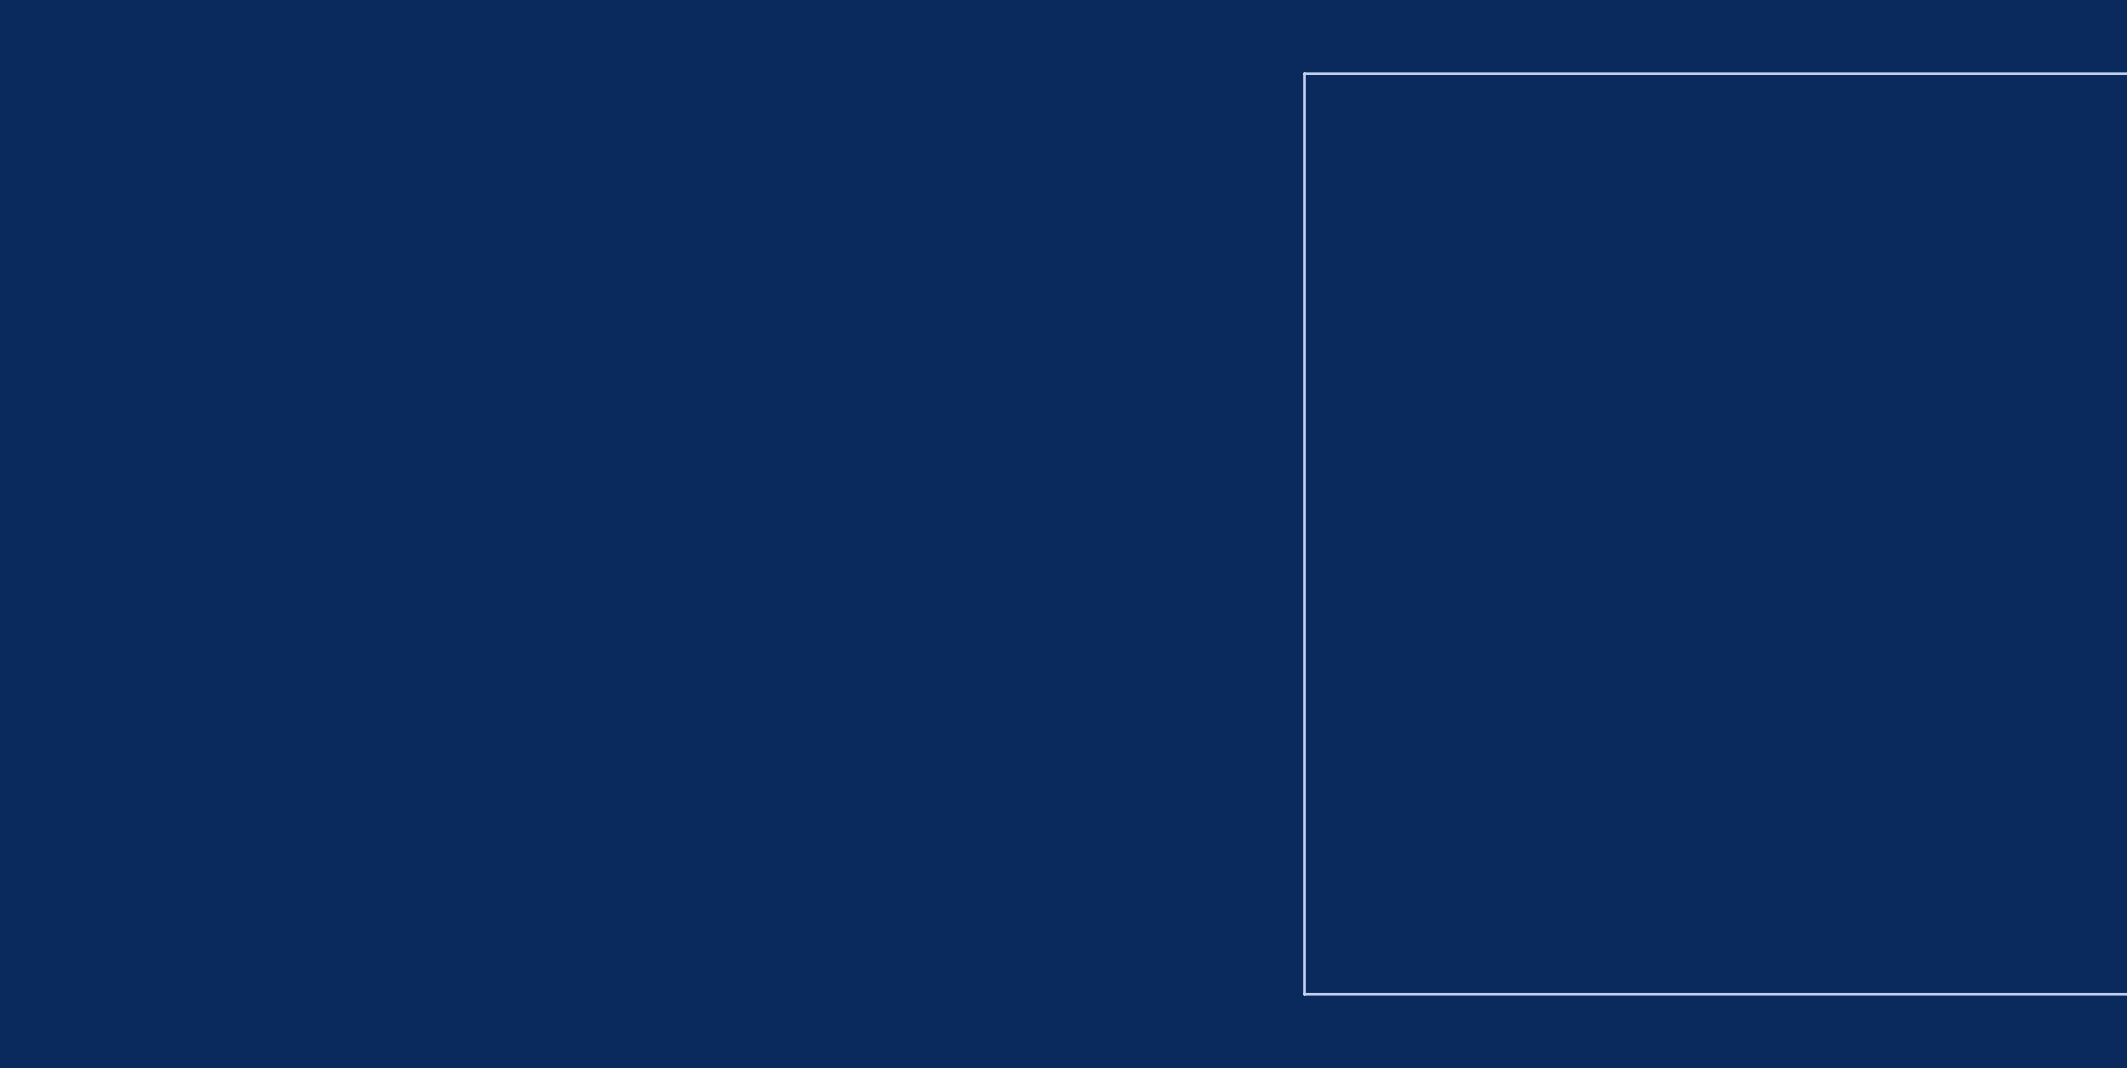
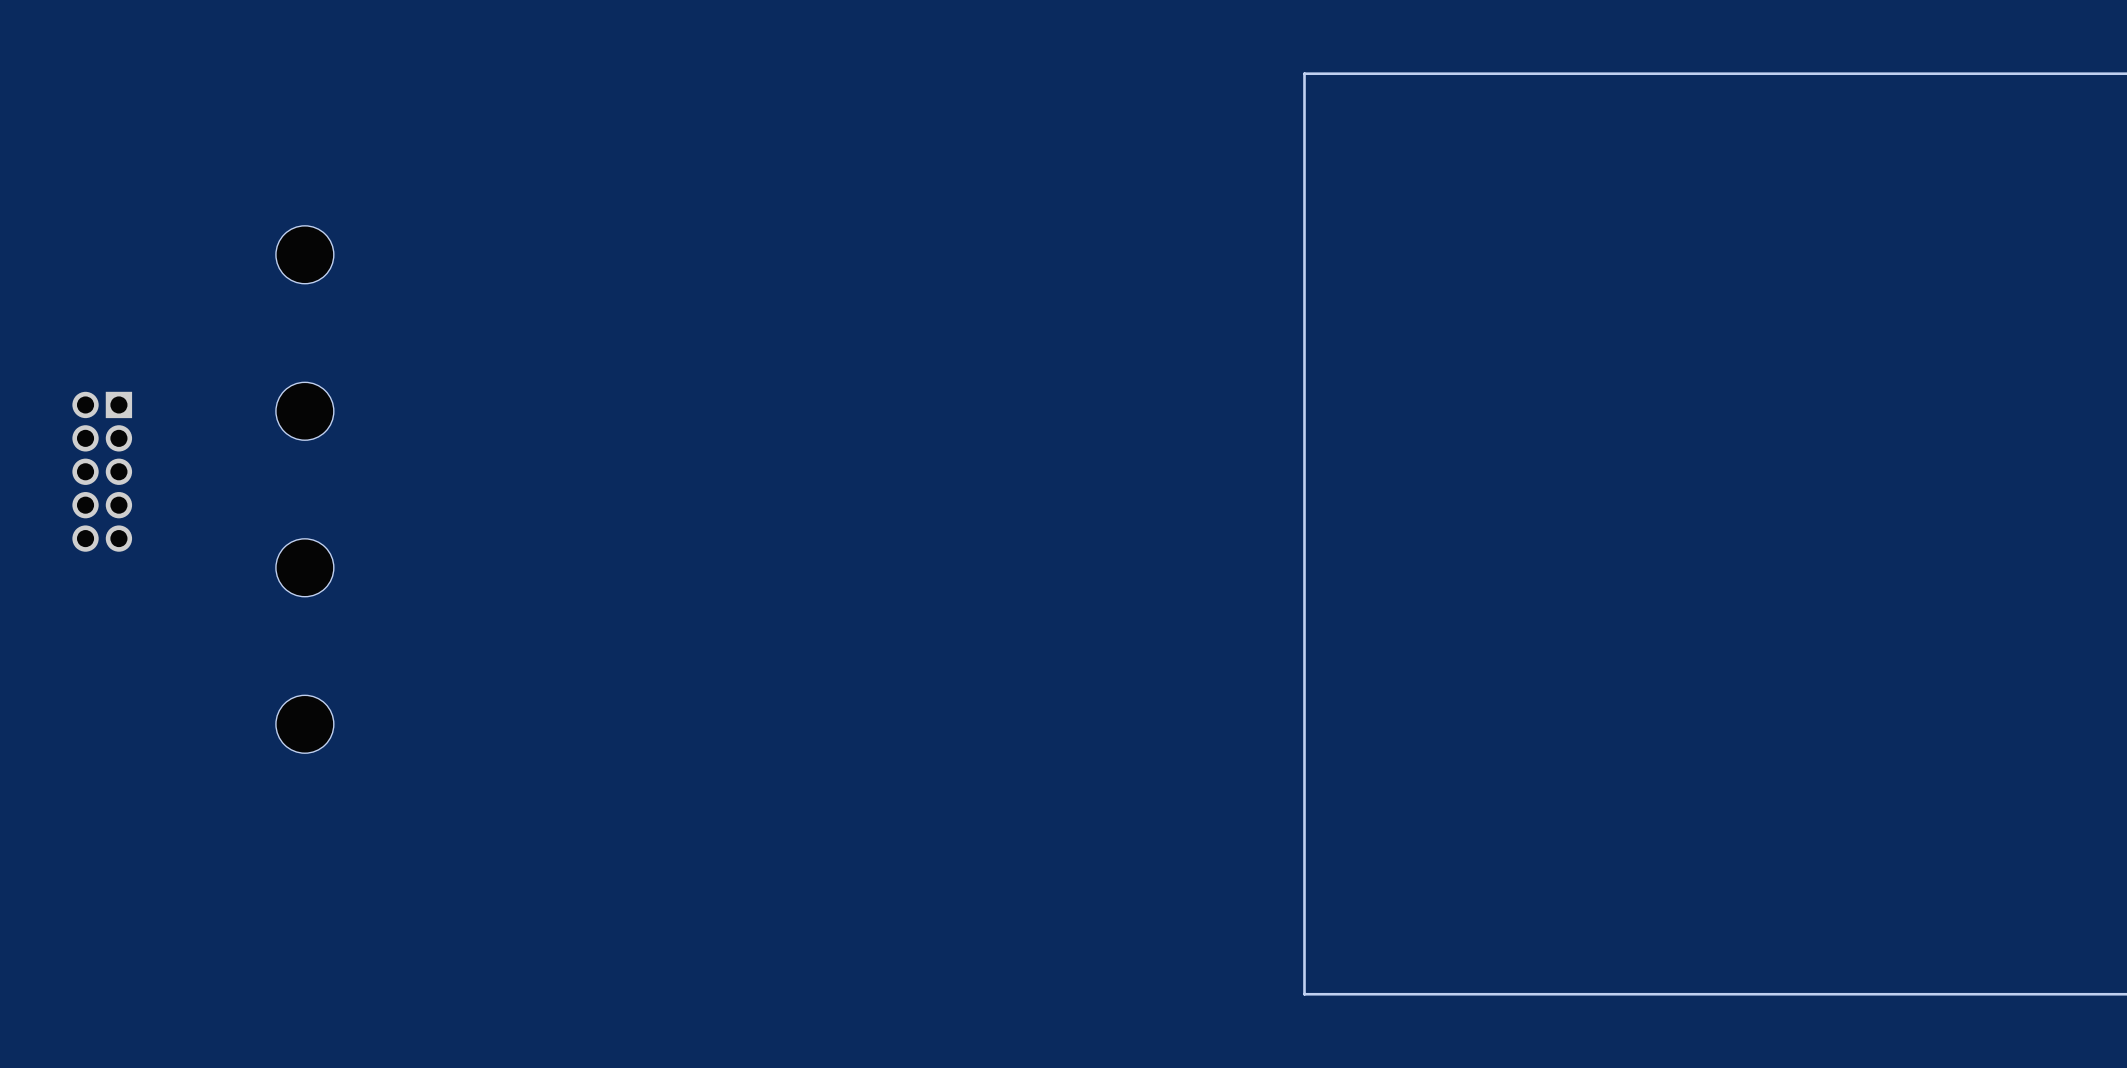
part: none -> (304, 254)
part: none -> (304, 411)
part: none -> (102, 471)
part: none -> (304, 567)
part: none -> (304, 724)

